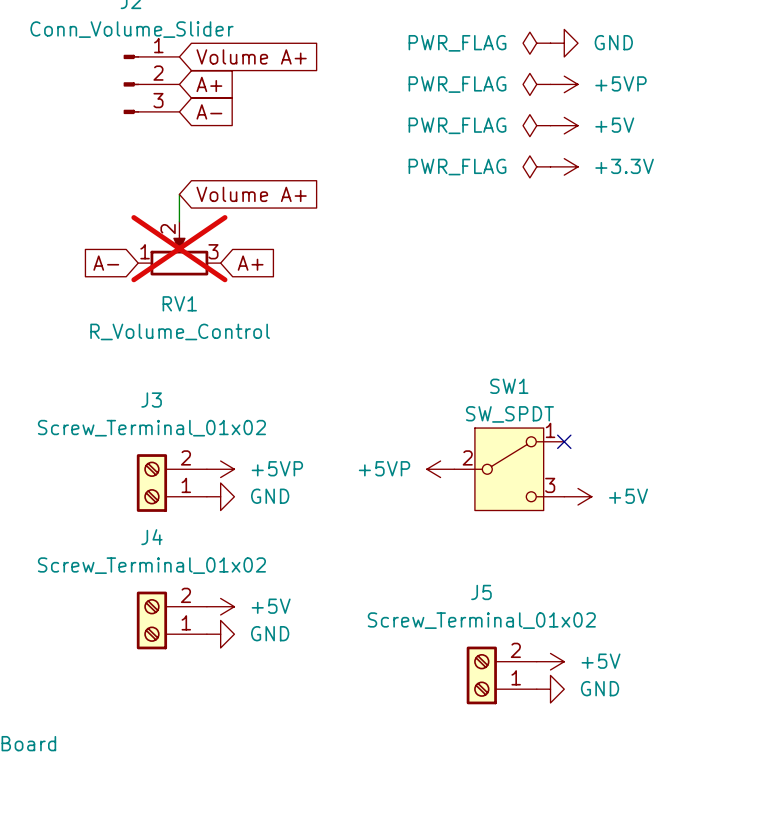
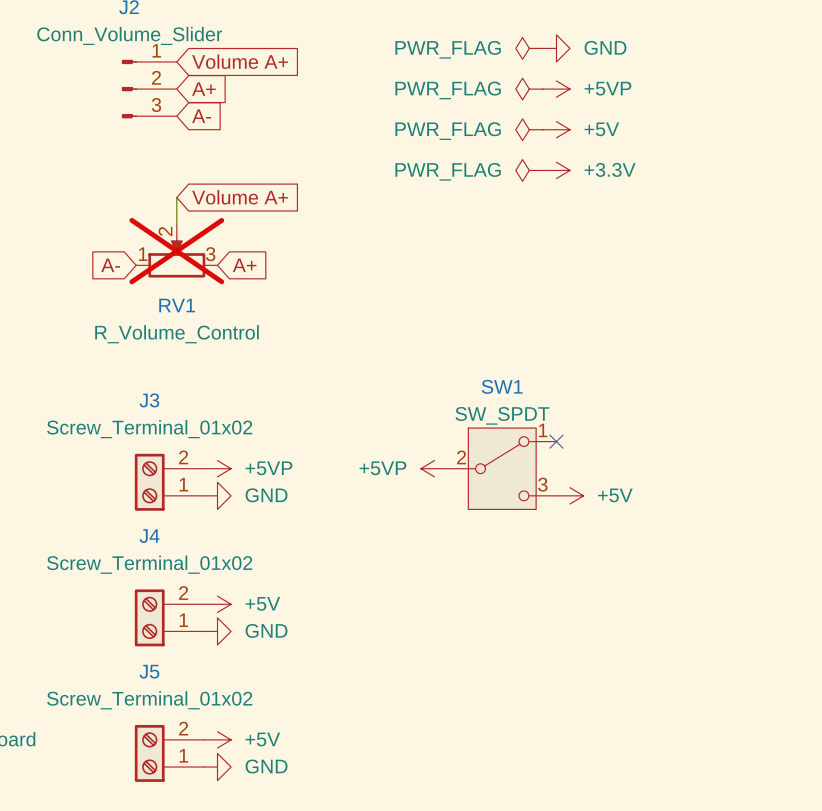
power symbol: +5V (550, 661) -> none
J5 position: (501, 675) -> (169, 753)
power symbol: GND (550, 689) -> none
power symbol: none -> +5V (217, 739)
power symbol: none -> GND (217, 767)

